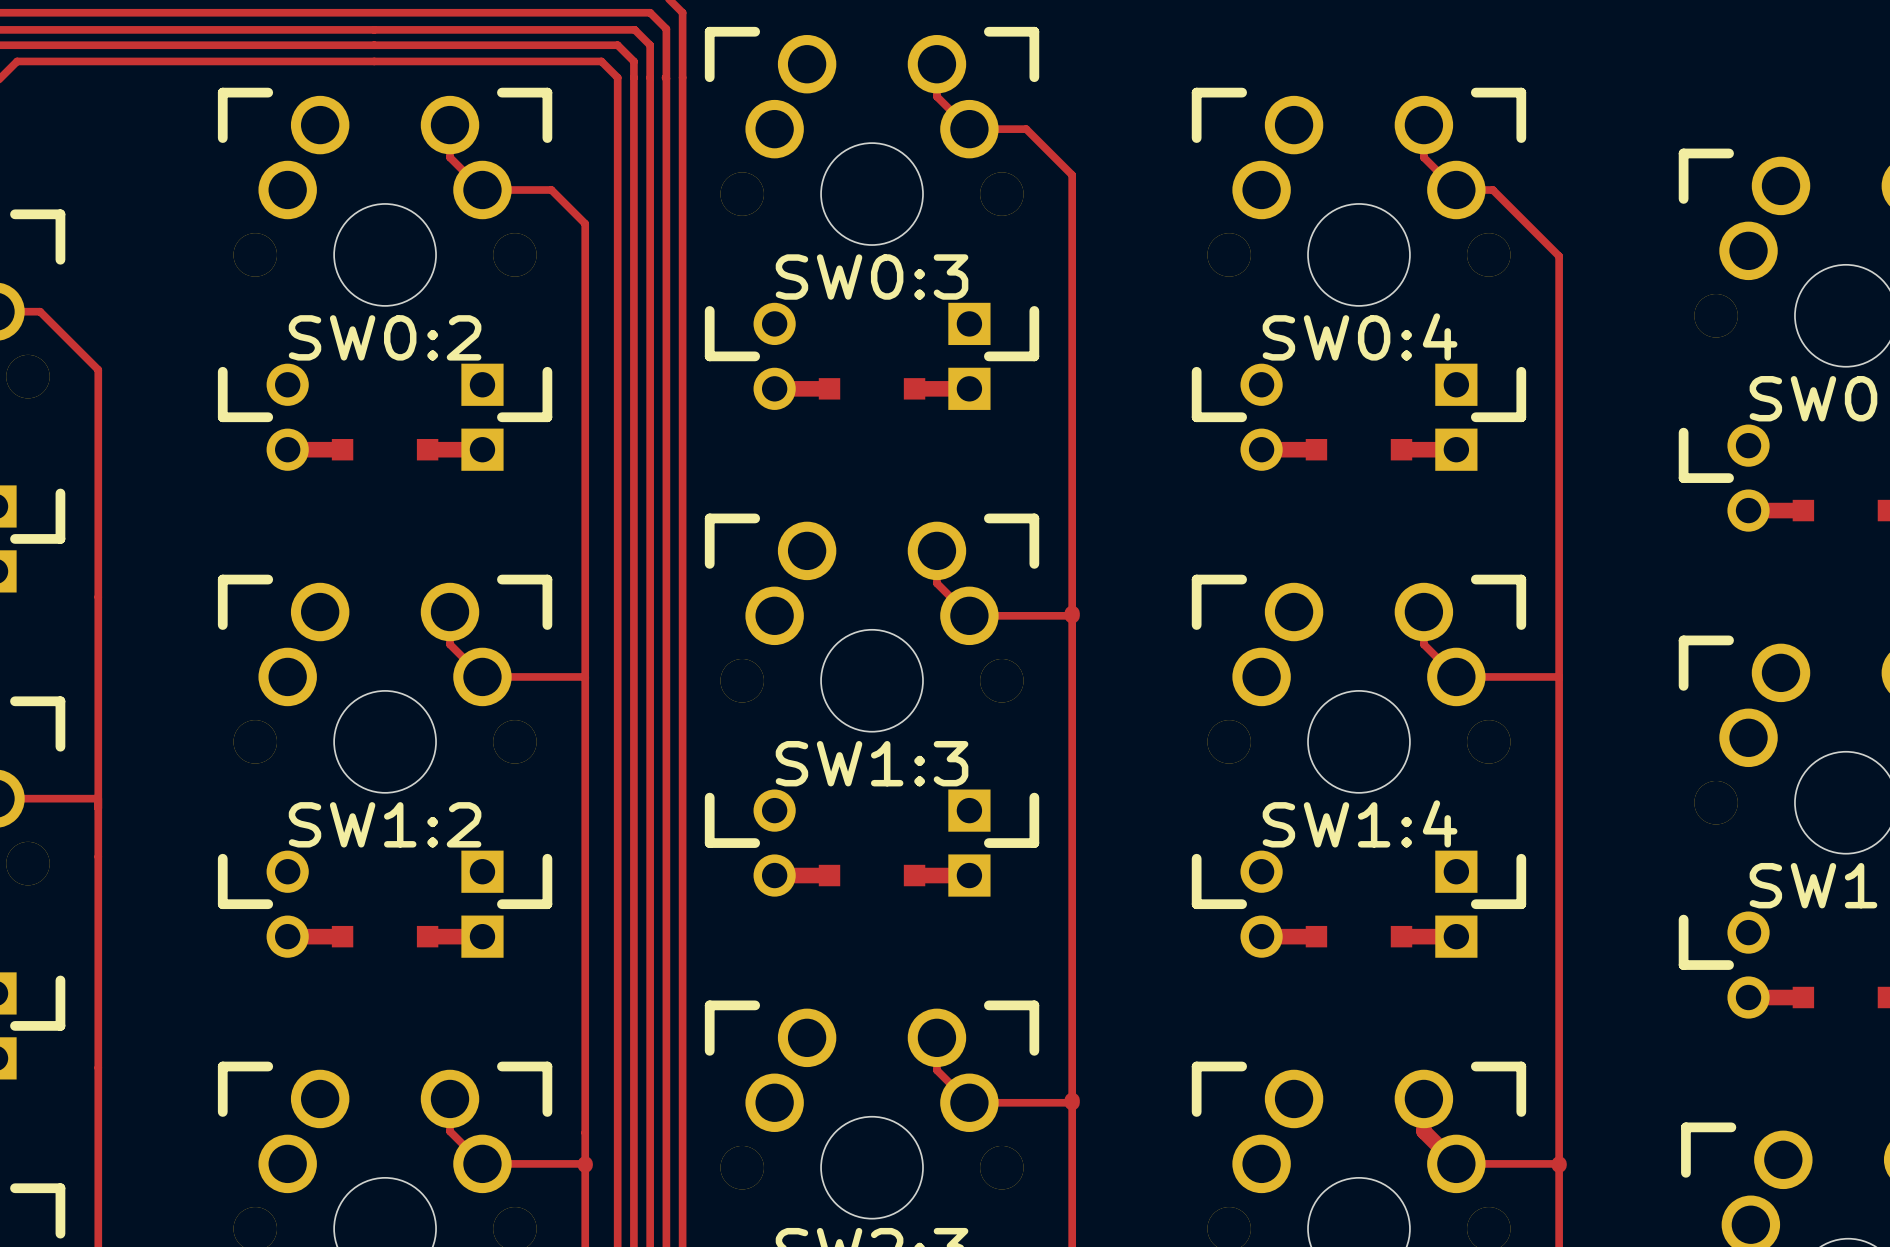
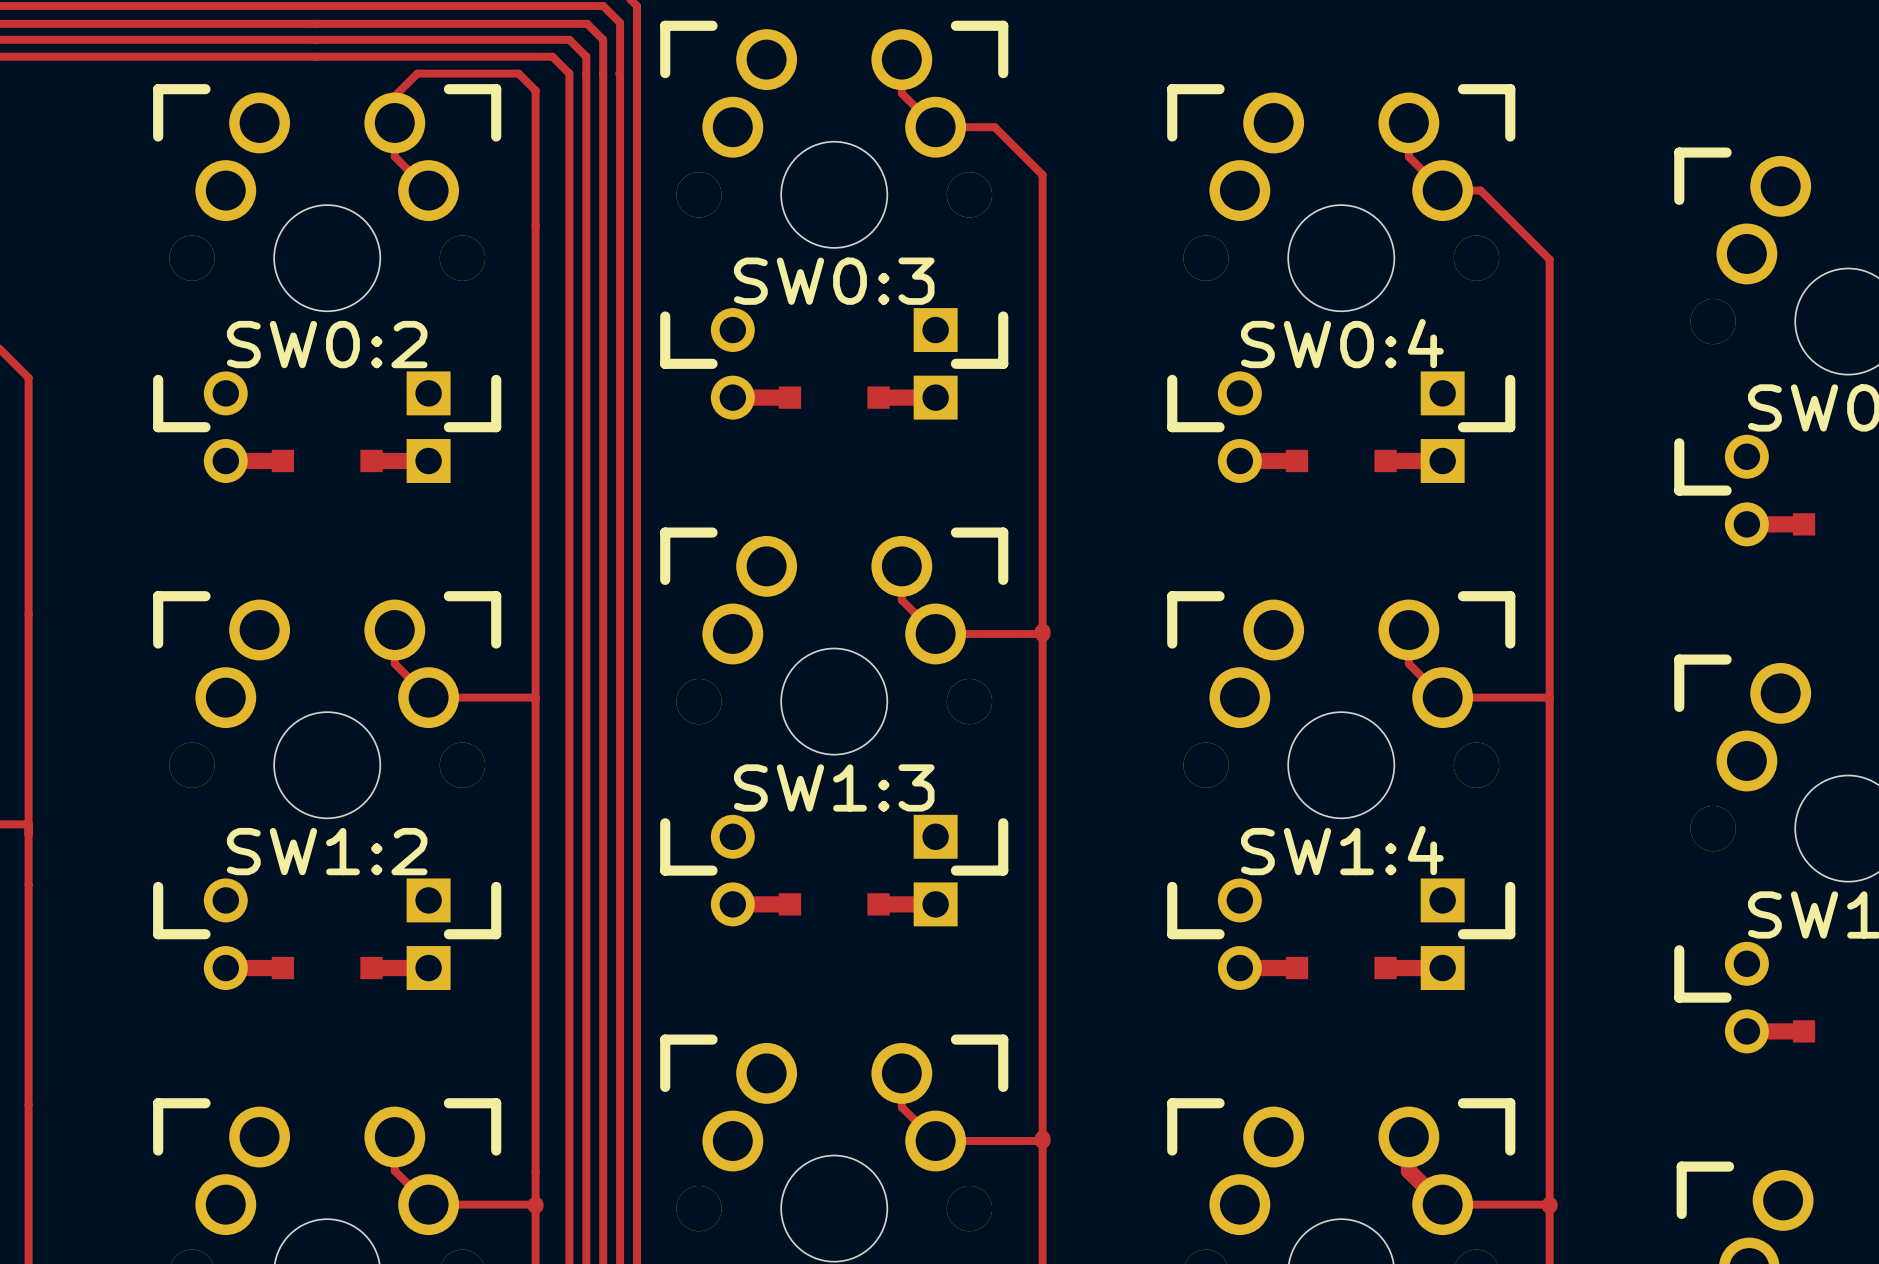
track: (482, 190) (551, 190) (585, 223) -> (394, 122) (394, 96) (417, 73) (518, 73) (535, 90) (535, 225)

